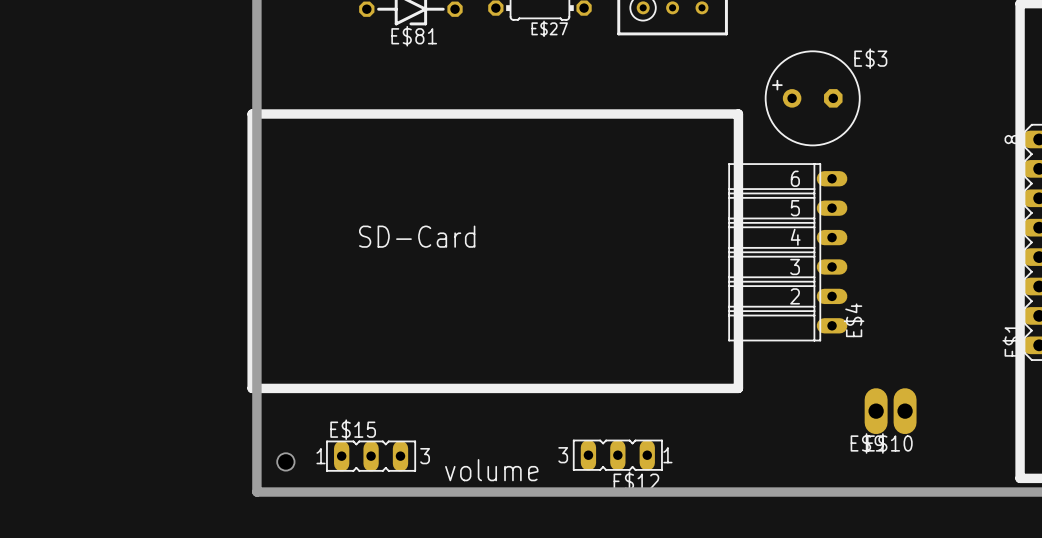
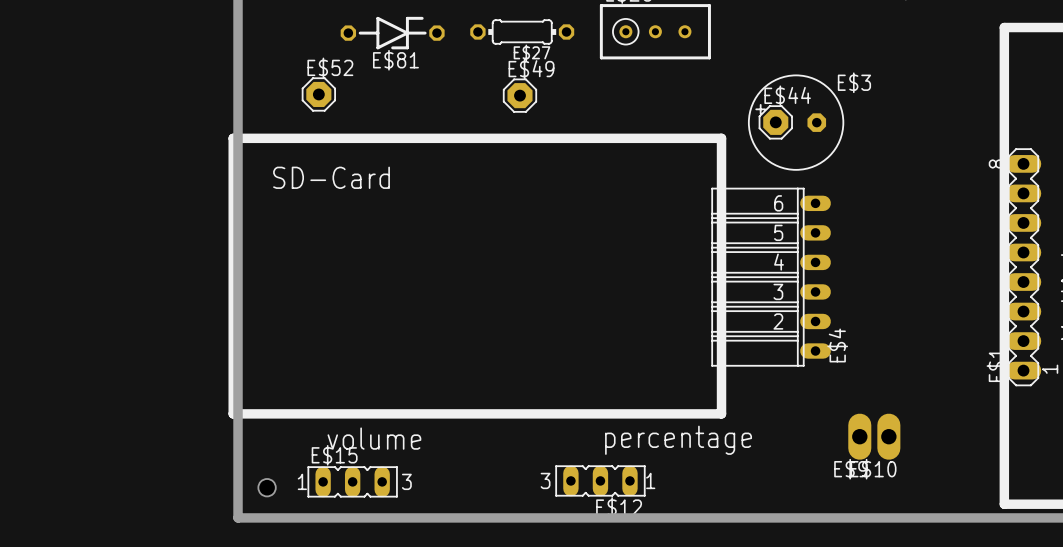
E$52: none -> (318, 94)
E$49: none -> (519, 95)
E$44: none -> (775, 122)
text position: SD-Card (417, 236) -> SD-Card (331, 177)
text: none -> percentage (678, 440)
text position: volume (491, 470) -> volume (374, 438)

